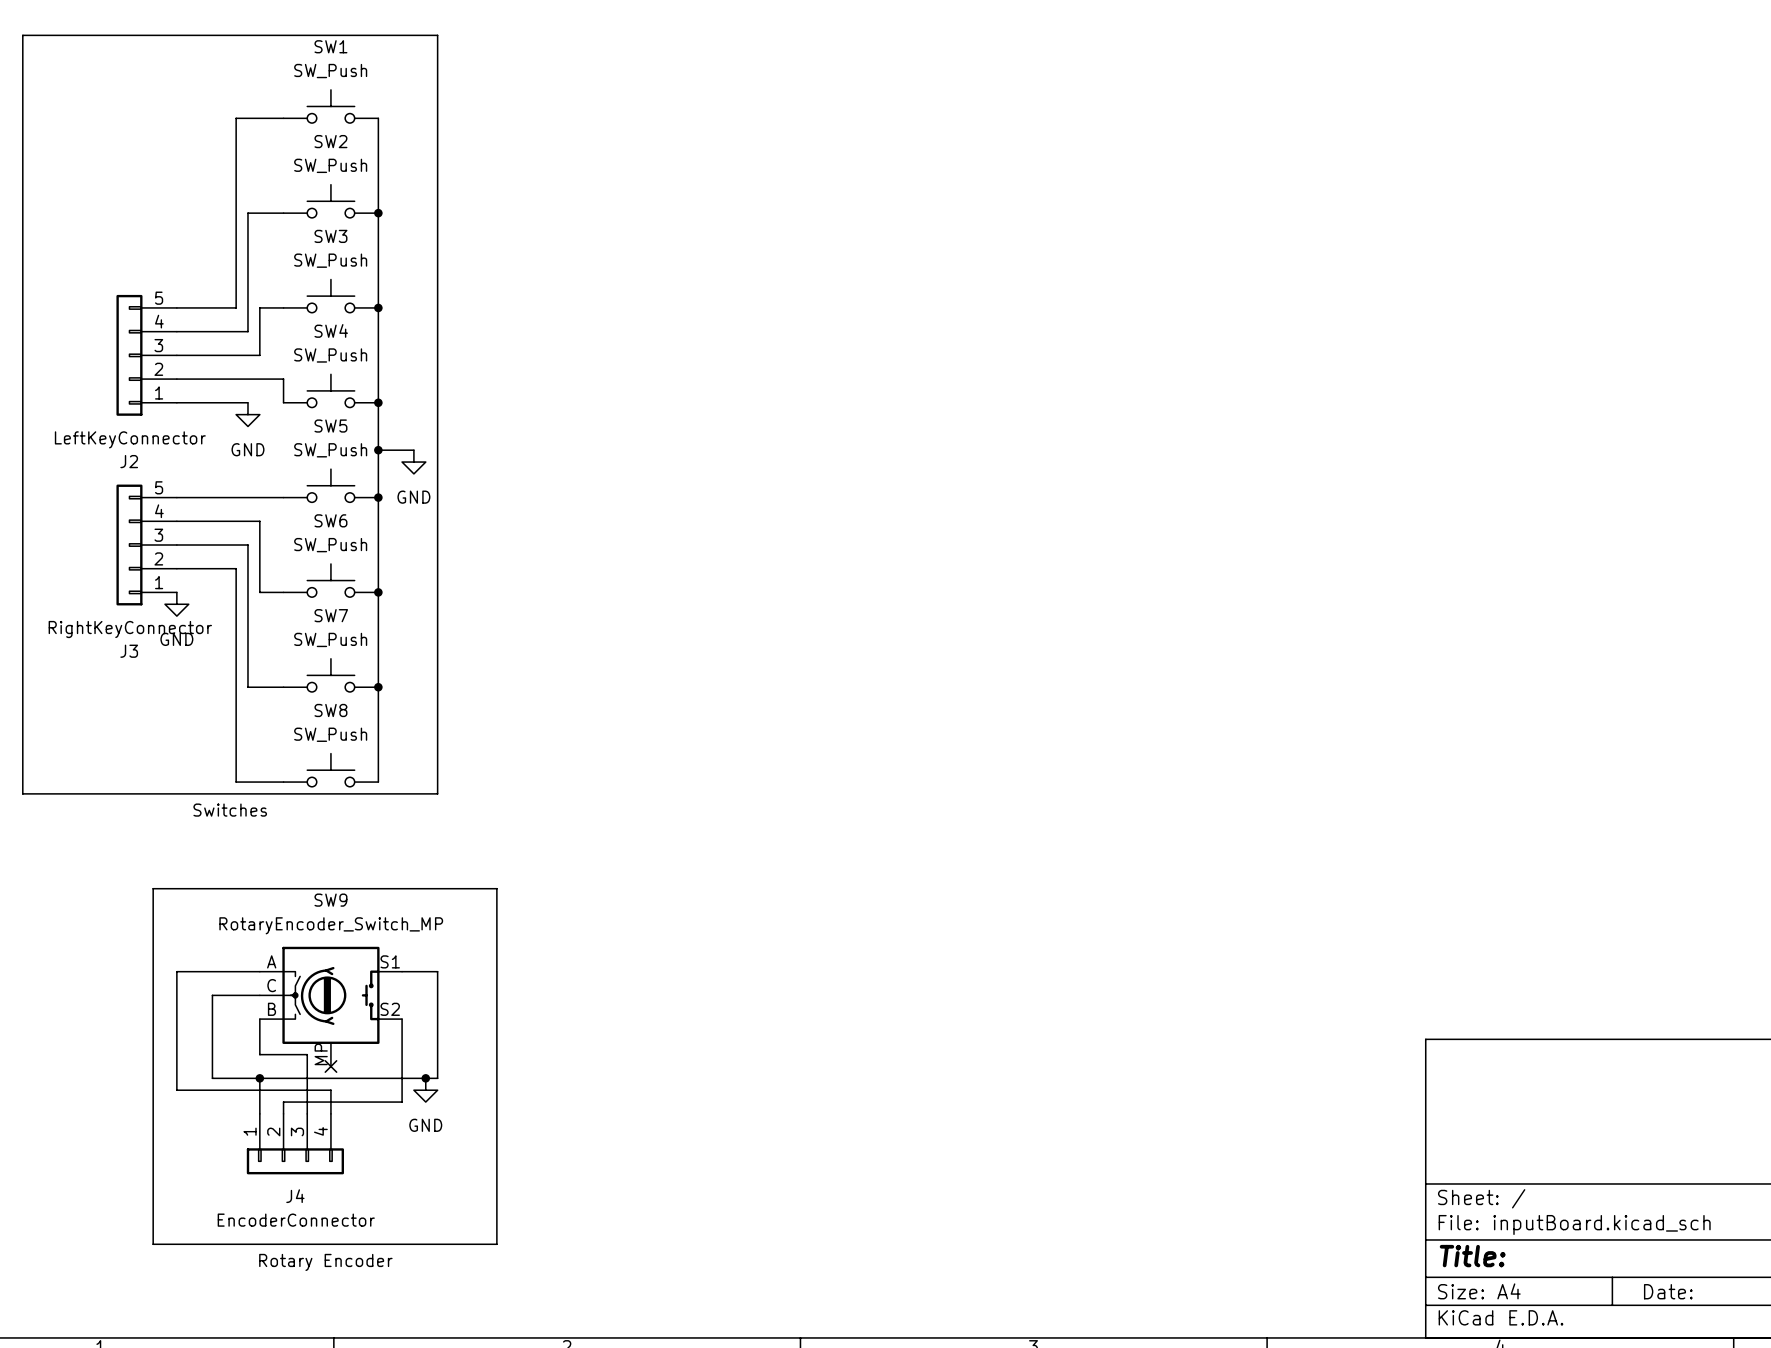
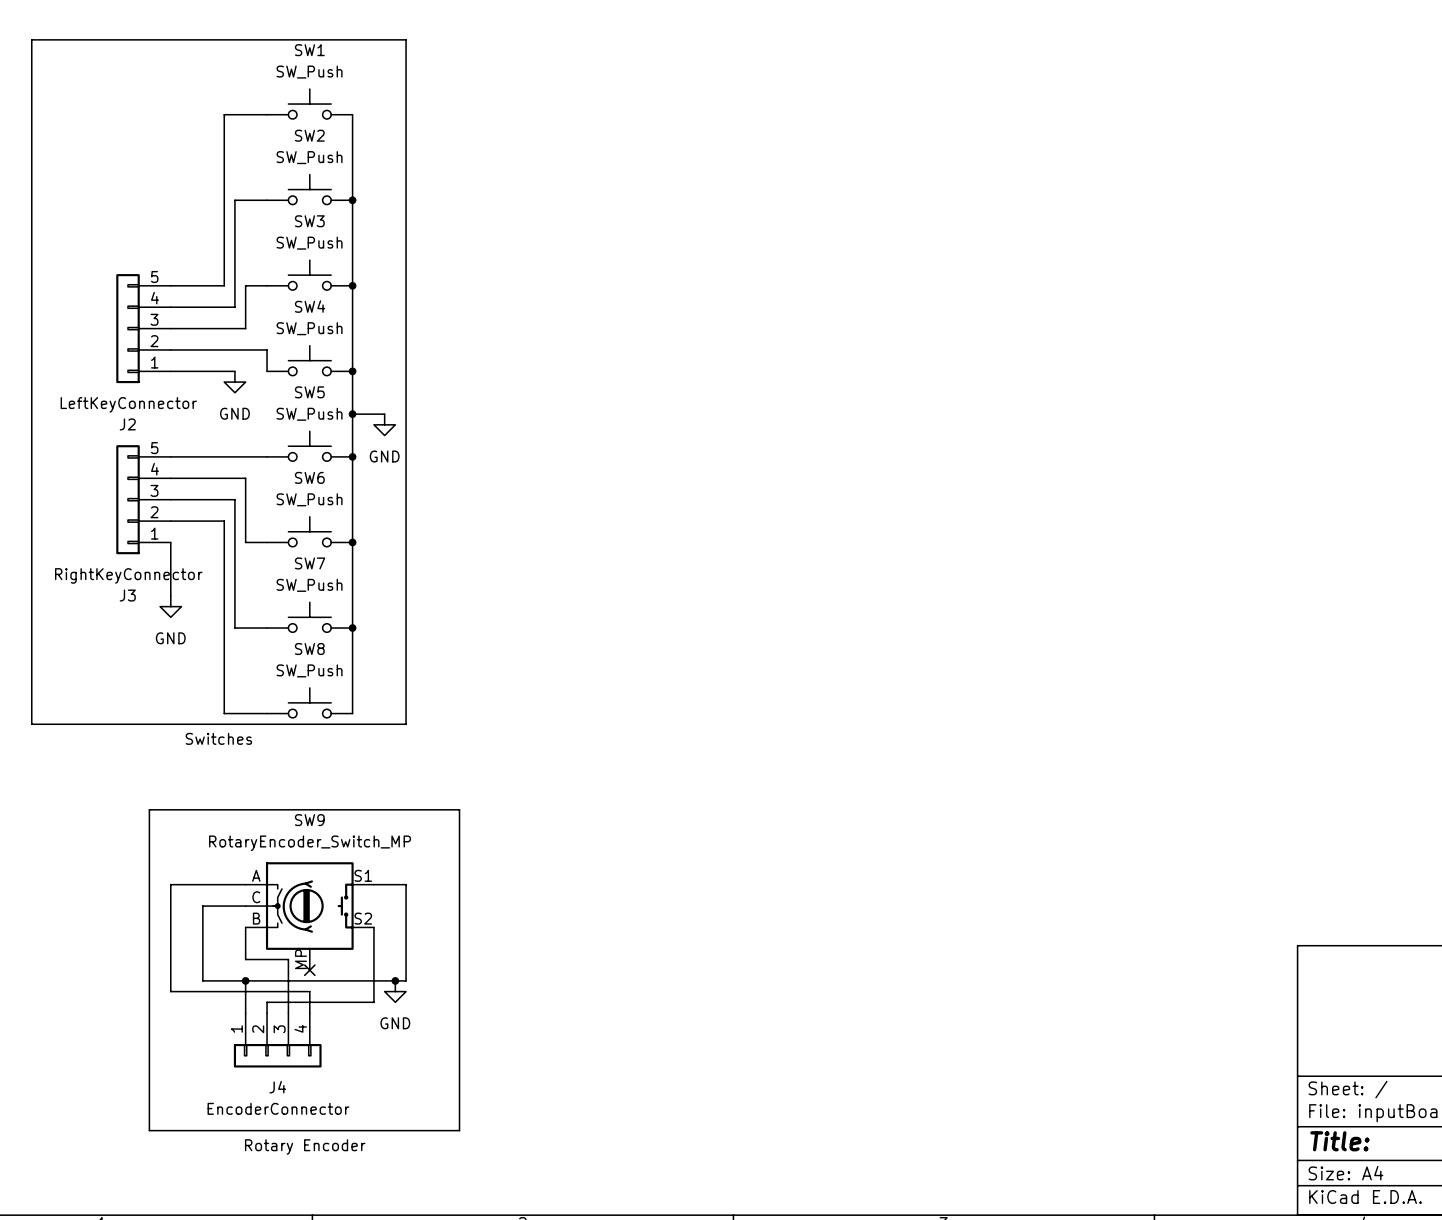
wire: none -> (170, 542) (170, 595)
power symbol position: GND (176, 604) -> GND (170, 606)

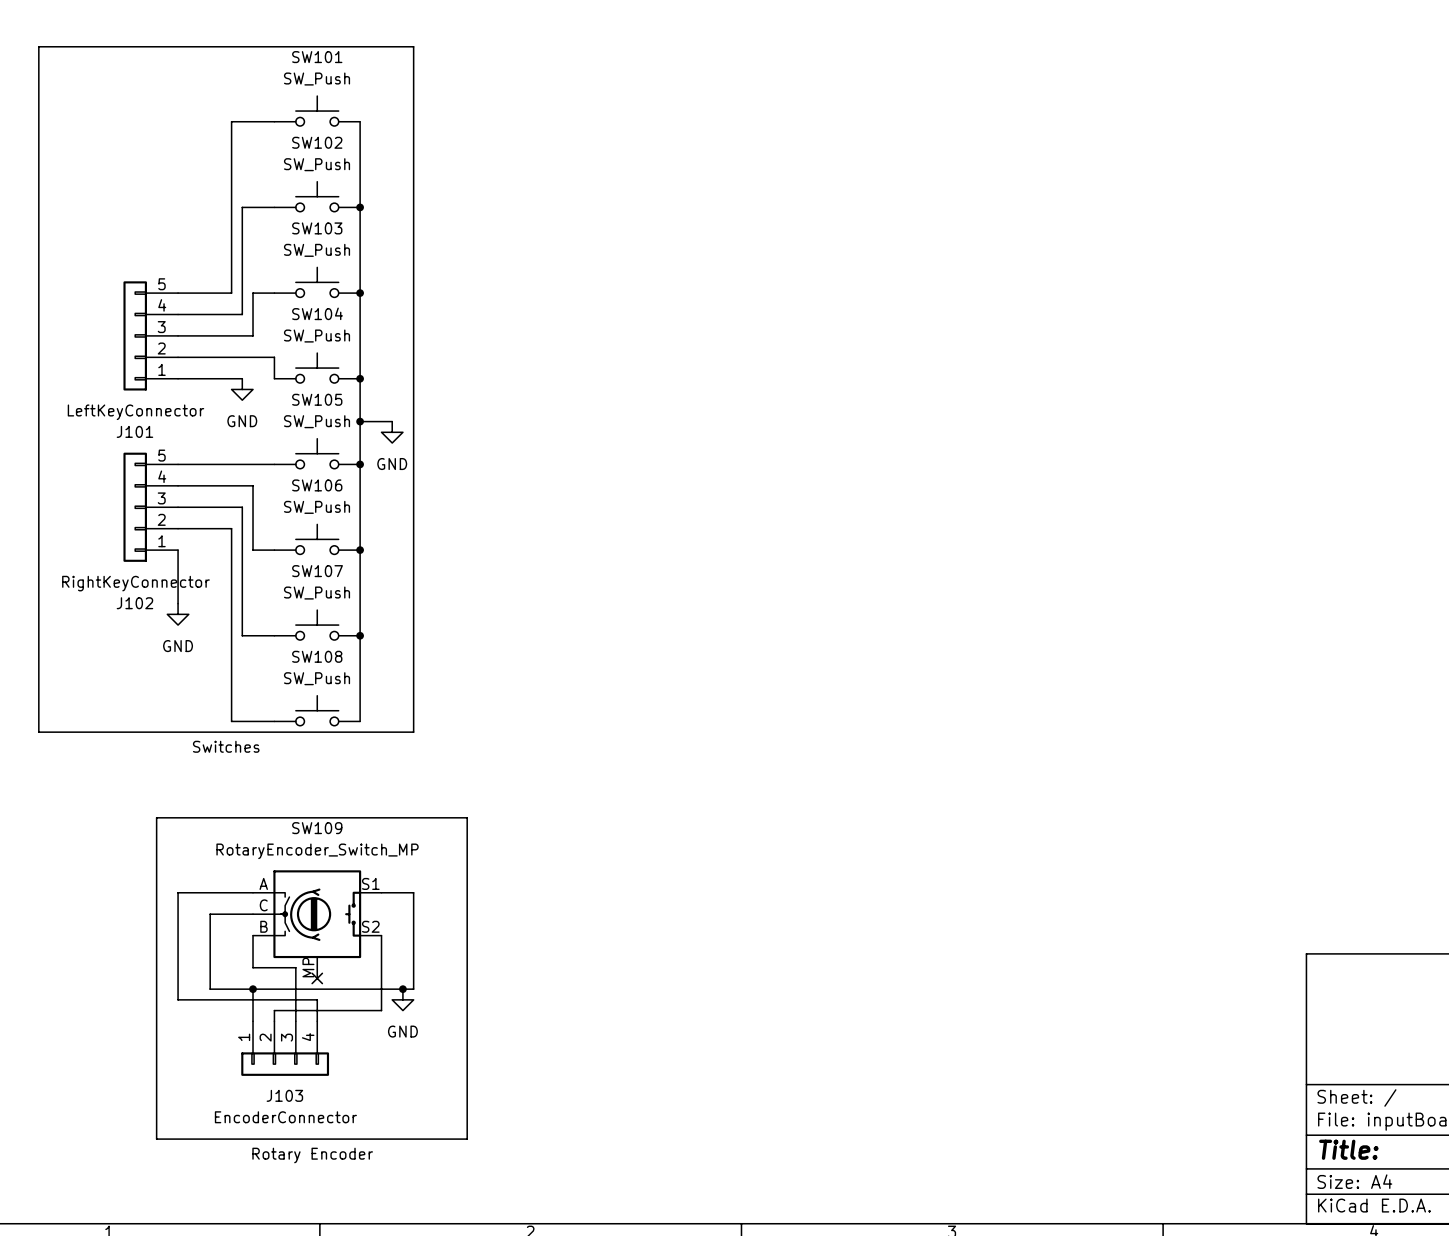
SW1 name: SW1 (309, 50) -> SW101 (317, 57)
SW2 name: SW2 (309, 135) -> SW102 (317, 142)
SW3 name: SW3 (309, 221) -> SW103 (317, 228)
SW4 name: SW4 (310, 306) -> SW104 (317, 313)
SW5 name: SW5 (309, 392) -> SW105 (317, 399)
J2 name: J2 (127, 424) -> J101 (134, 431)
SW6 name: SW6 (309, 477) -> SW106 (317, 485)
SW7 name: SW7 (310, 563) -> SW107 (317, 571)
J3 name: J3 (127, 595) -> J102 (134, 603)
SW8 name: SW8 (309, 649) -> SW108 (317, 656)
SW9 name: SW9 (309, 820) -> SW109 (317, 828)
J4 name: J4 (277, 1087) -> J103 (284, 1095)

